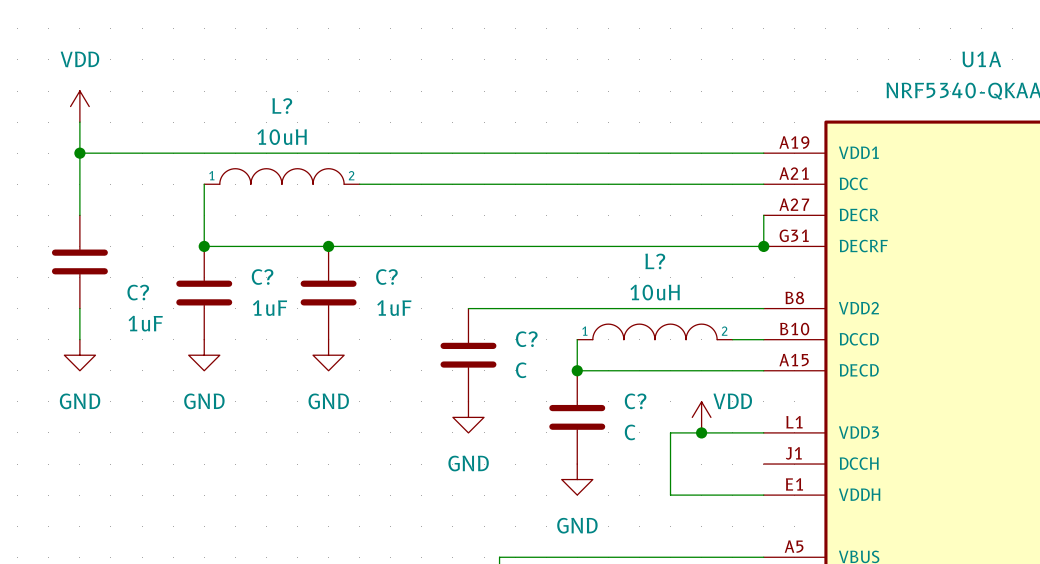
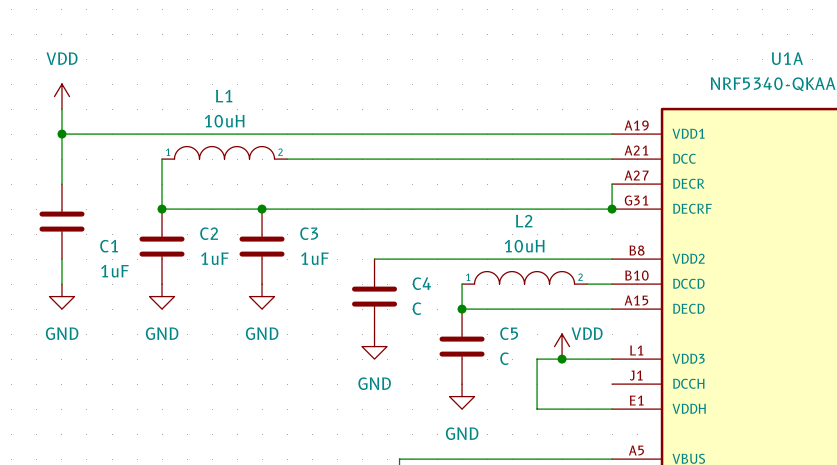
L? name: L? (282, 106) -> L1 (224, 96)
L? name: L? (655, 261) -> L2 (524, 221)
C? name: C? (262, 277) -> C2 (209, 233)
C? name: C? (386, 277) -> C3 (309, 233)
C? name: C? (138, 292) -> C1 (109, 246)
C? name: C? (526, 339) -> C4 (421, 283)
C? name: C? (635, 401) -> C5 (509, 333)

